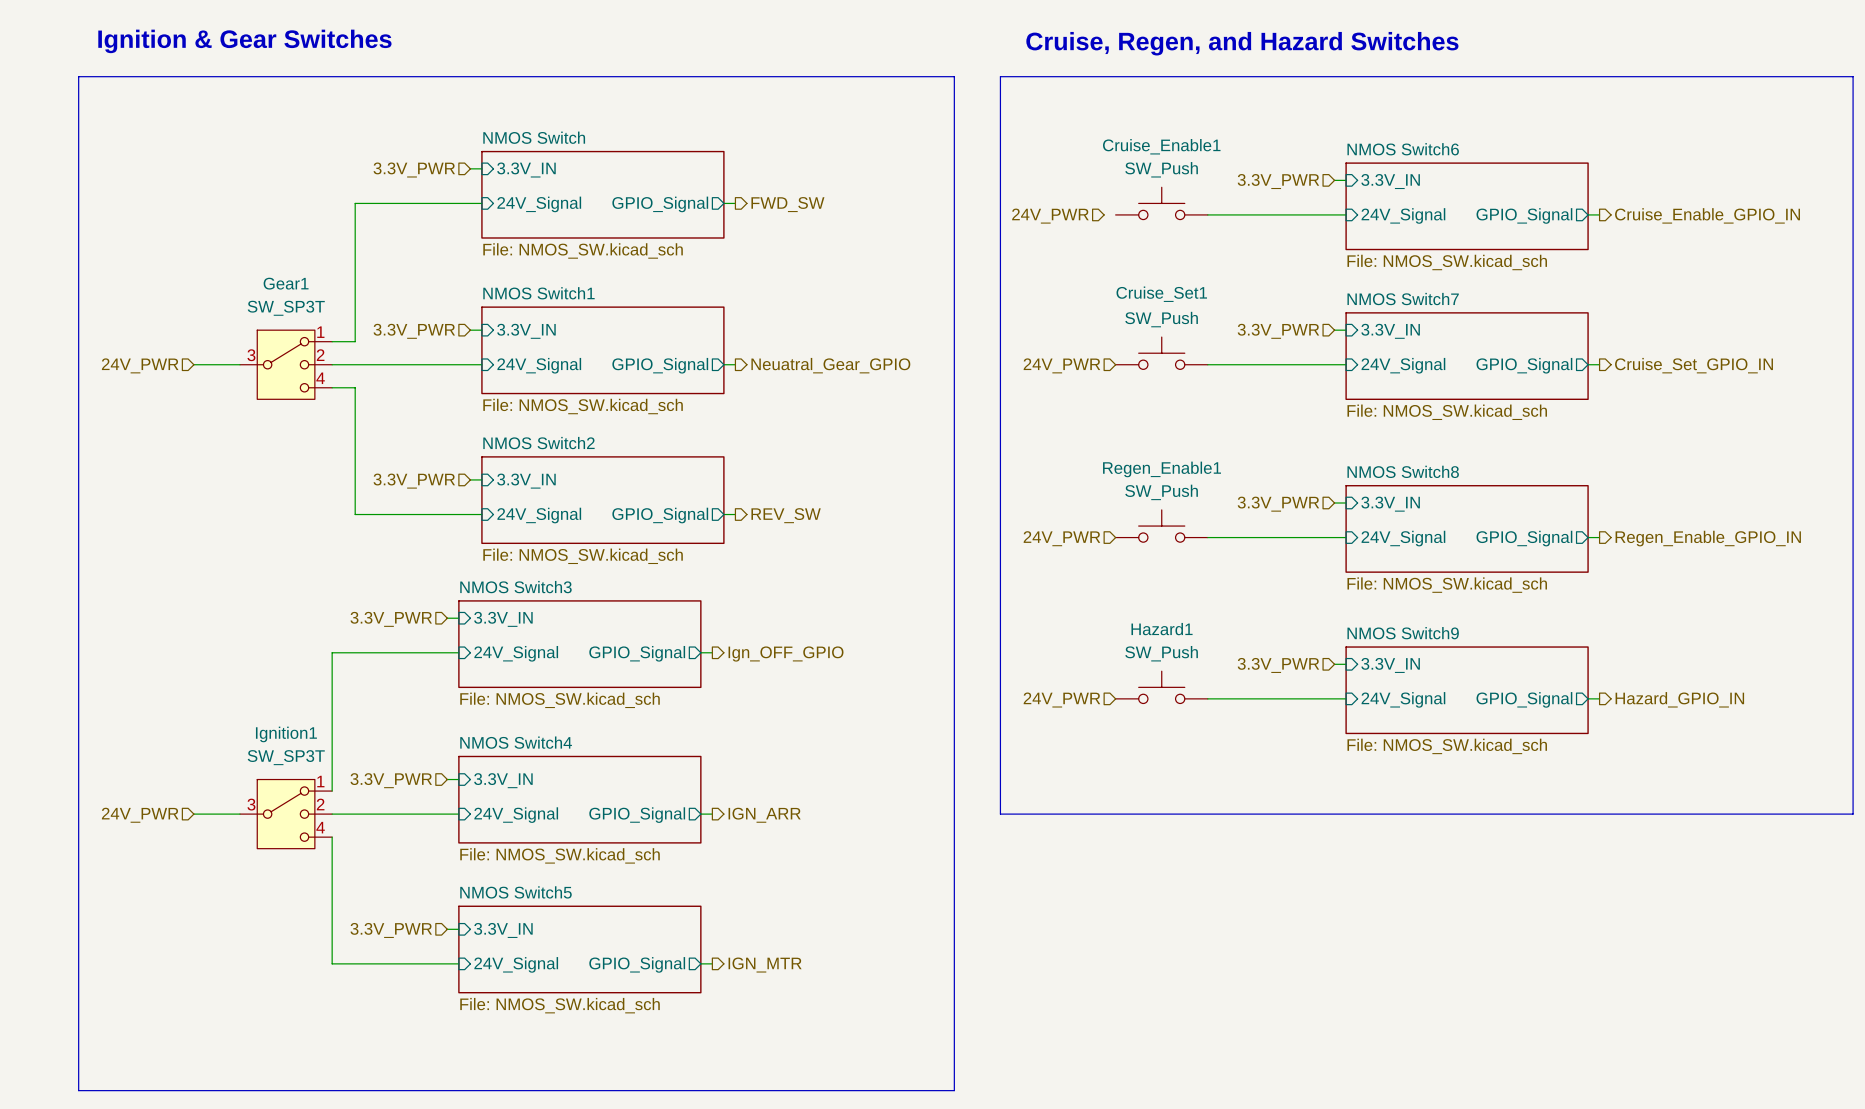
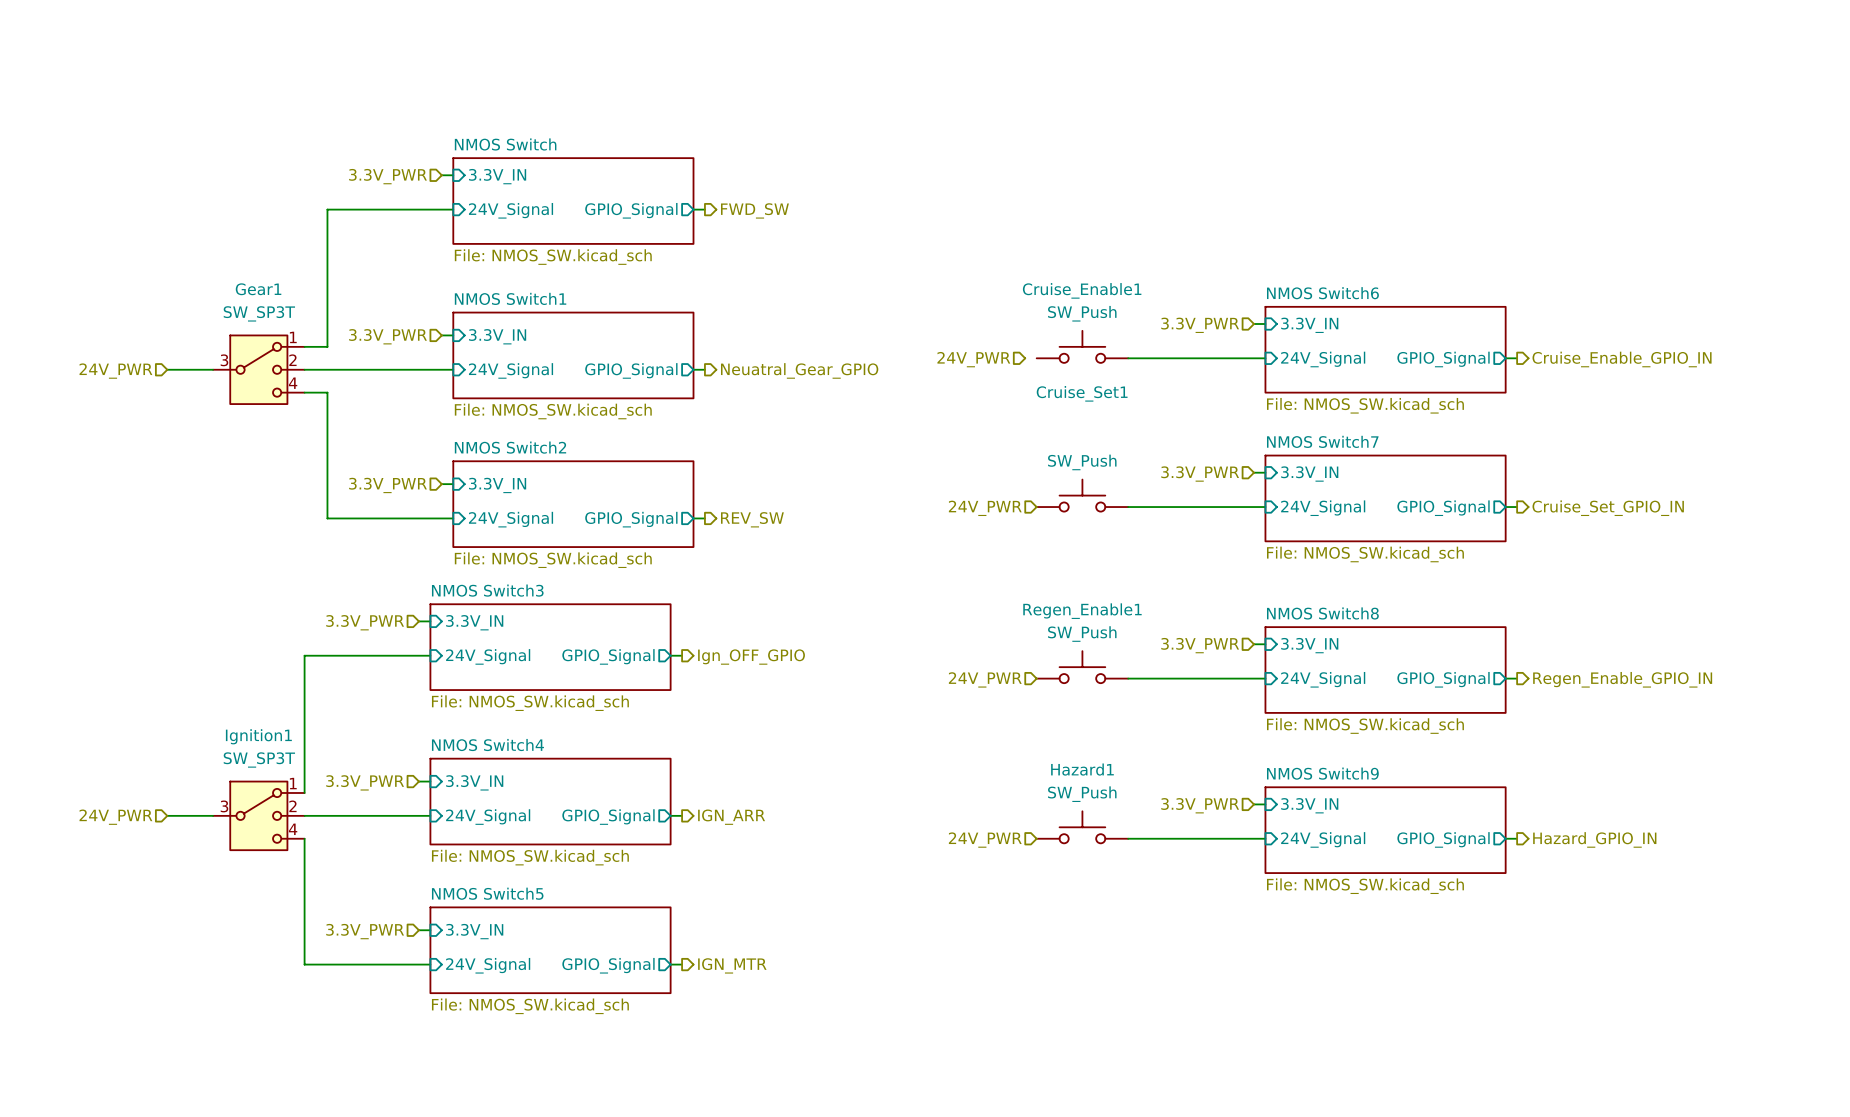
text: Ignition & Gear Switches (244, 41) -> none
text: Cruise, Regen, and Hazard Switches (1242, 43) -> none
line: (78, 76) (954, 76) (954, 1090) (78, 1090) (78, 76) -> none
line: (1000, 76) (1853, 76) (1853, 814) (1000, 814) (1000, 76) -> none
wire: (1334, 180) (1346, 180) -> (1254, 324) (1265, 324)
hierarchical label: 3.3V_PWR (1278, 181) -> none
sheet pin: 3.3V_IN (1390, 181) -> none
Cruise_Enable1 position: (1161, 203) -> (1082, 346)
sheet NMOS Switch6 position: (1467, 206) -> (1385, 349)
wire: (1207, 214) (1346, 214) -> (1128, 358) (1265, 358)
wire: (1588, 214) (1599, 214) -> (1505, 358) (1517, 358)
sheet pin: 24V_Signal (1403, 215) -> none
sheet pin: GPIO_Signal (1524, 215) -> none
hierarchical label position: Cruise_Enable_GPIO_IN (1707, 215) -> Cruise_Enable_GPIO_IN (1622, 359)
hierarchical label: 24V_PWR (1050, 216) -> none
Cruise_Set1 name position: Cruise_Set1 (1161, 294) -> Cruise_Set1 (1082, 393)
wire: (1334, 330) (1346, 330) -> (1254, 472) (1265, 472)
hierarchical label position: 3.3V_PWR (1278, 331) -> 3.3V_PWR (1200, 325)
sheet pin position: 3.3V_IN (1390, 331) -> 3.3V_IN (1309, 325)
Cruise_Set1 position: (1161, 353) -> (1082, 495)
sheet NMOS Switch7 position: (1467, 356) -> (1385, 498)
wire: (1207, 364) (1346, 364) -> (1128, 507) (1265, 507)
wire: (1588, 364) (1599, 364) -> (1505, 507) (1517, 507)
hierarchical label position: 24V_PWR (1061, 365) -> 24V_PWR (973, 359)
sheet pin position: 24V_Signal (1403, 365) -> 24V_Signal (1323, 359)
sheet pin position: GPIO_Signal (1524, 365) -> GPIO_Signal (1443, 359)
hierarchical label position: Cruise_Set_GPIO_IN (1694, 365) -> Cruise_Set_GPIO_IN (1608, 508)
wire: (1334, 503) (1346, 503) -> (1254, 644) (1265, 644)
hierarchical label position: 3.3V_PWR (1278, 504) -> 3.3V_PWR (1200, 474)
sheet pin position: 3.3V_IN (1390, 504) -> 3.3V_IN (1309, 474)
Regen_Enable1 position: (1161, 526) -> (1082, 667)
sheet NMOS Switch8 position: (1467, 528) -> (1385, 670)
wire: (1207, 537) (1346, 537) -> (1128, 678) (1265, 678)
wire: (1588, 537) (1599, 537) -> (1505, 678) (1517, 678)
hierarchical label position: 24V_PWR (1061, 538) -> 24V_PWR (985, 508)
sheet pin position: 24V_Signal (1403, 538) -> 24V_Signal (1323, 508)
sheet pin position: GPIO_Signal (1524, 538) -> GPIO_Signal (1443, 508)
hierarchical label position: Regen_Enable_GPIO_IN (1708, 538) -> Regen_Enable_GPIO_IN (1622, 679)
wire: (1334, 664) (1346, 664) -> (1254, 804) (1265, 804)
hierarchical label position: 3.3V_PWR (1278, 665) -> 3.3V_PWR (1200, 645)
sheet pin position: 3.3V_IN (1390, 665) -> 3.3V_IN (1309, 645)
Hazard1 position: (1161, 687) -> (1082, 827)
sheet NMOS Switch9 position: (1467, 690) -> (1385, 830)
wire: (1207, 698) (1346, 698) -> (1128, 838) (1265, 838)
wire: (1588, 698) (1599, 698) -> (1505, 838) (1517, 838)
sheet pin position: 24V_Signal (1403, 699) -> 24V_Signal (1323, 679)
sheet pin position: GPIO_Signal (1524, 699) -> GPIO_Signal (1443, 679)
hierarchical label position: Hazard_GPIO_IN (1679, 699) -> Hazard_GPIO_IN (1594, 839)
hierarchical label position: 24V_PWR (1061, 700) -> 24V_PWR (985, 679)
hierarchical label: none -> 3.3V_PWR (1200, 805)
sheet pin: none -> 3.3V_IN (1309, 805)
hierarchical label: none -> 24V_PWR (985, 840)
sheet pin: none -> 24V_Signal (1323, 839)
sheet pin: none -> GPIO_Signal (1443, 839)

